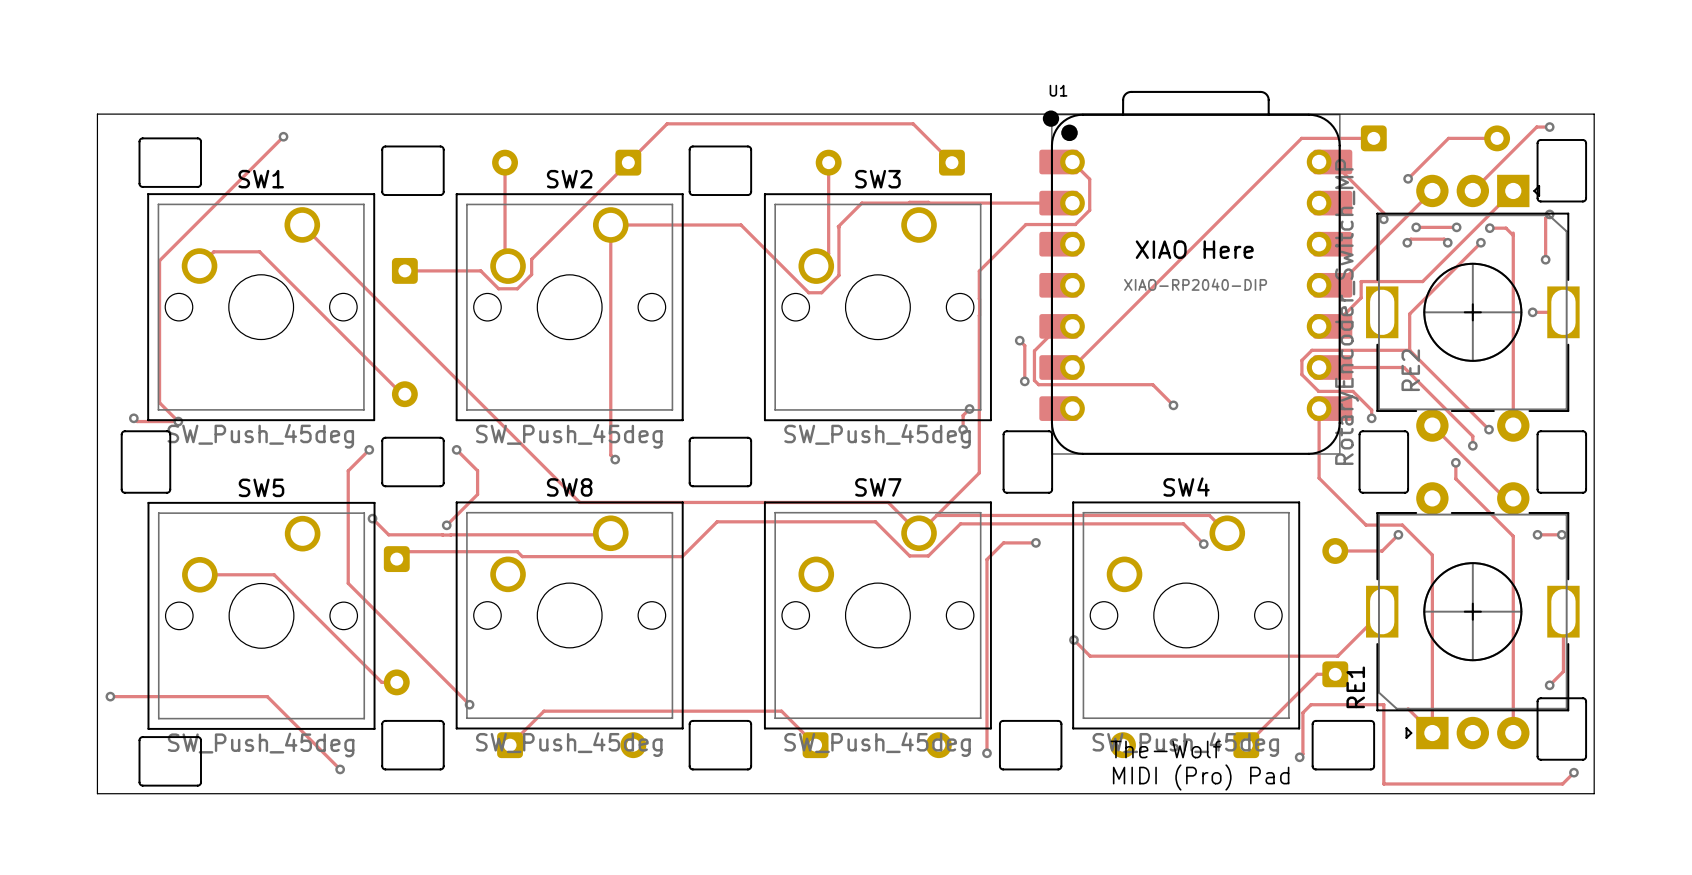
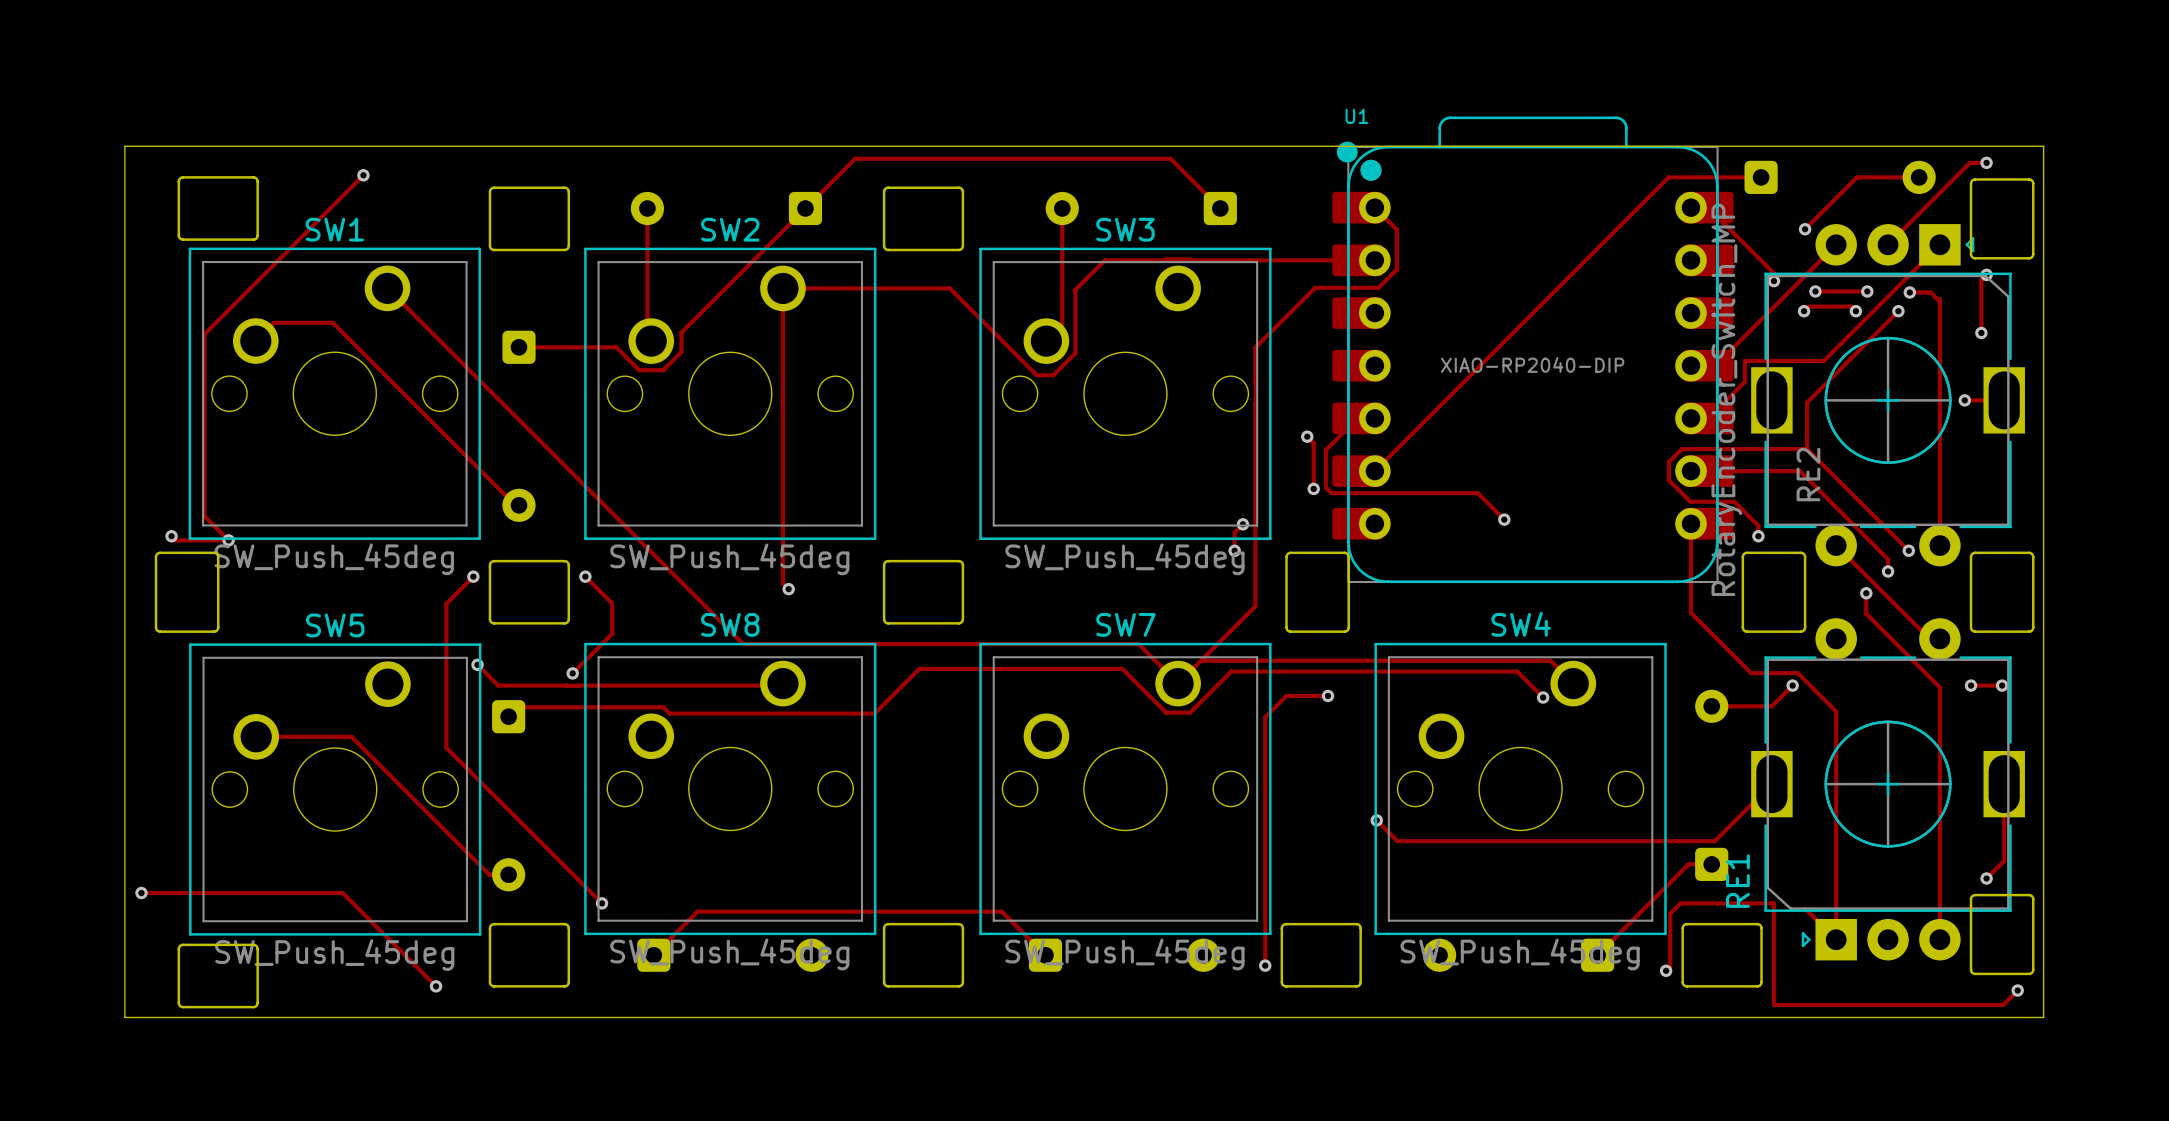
text: XIAO Here (1194, 249) -> none
text: The-Wolf (1165, 749) -> none
text: MIDI (Pro) Pad (1201, 777) -> none

